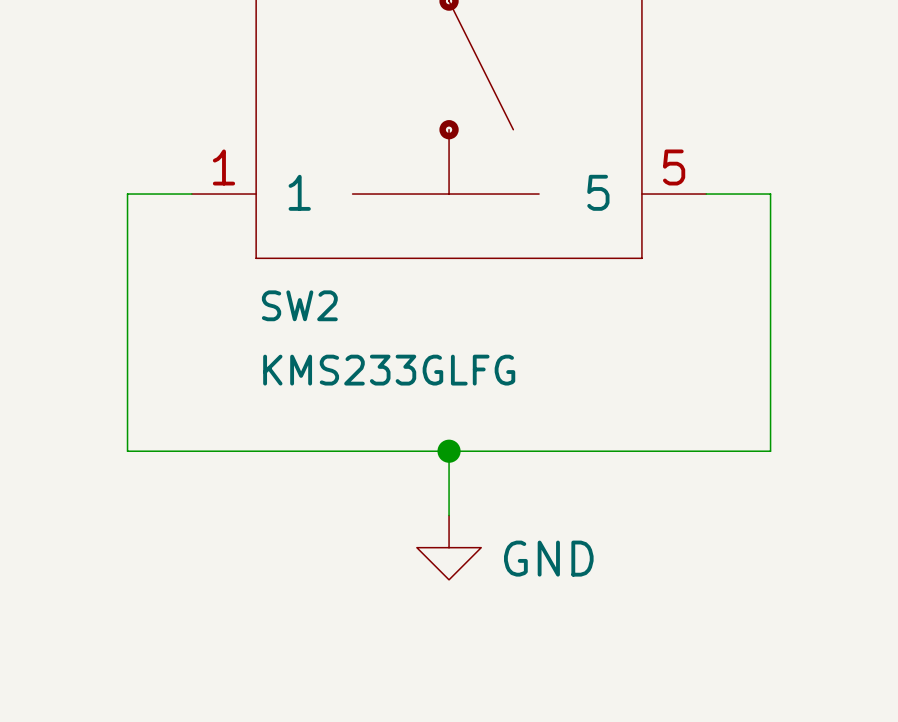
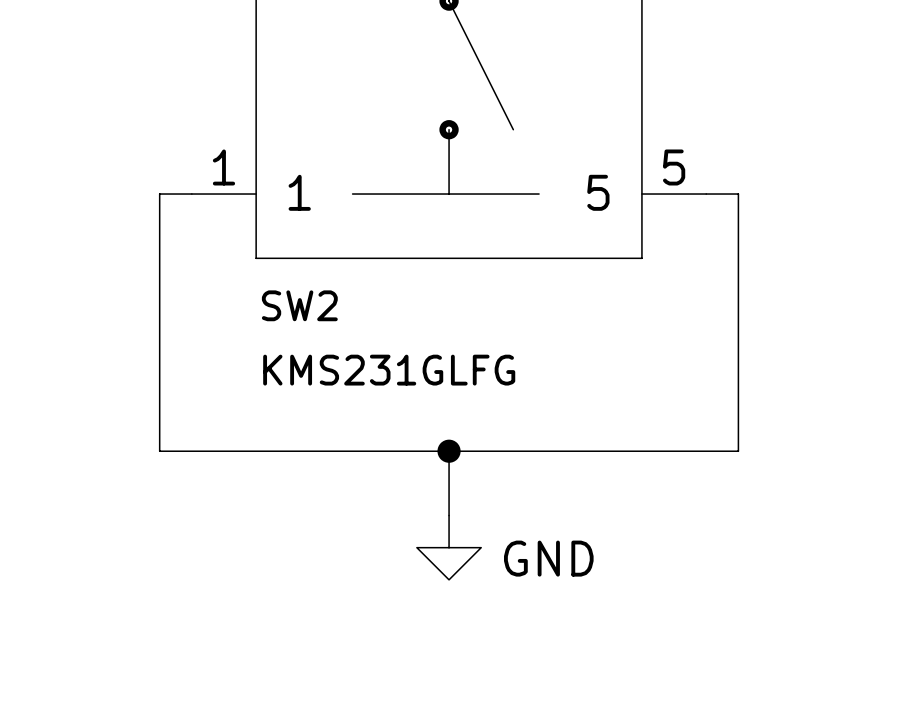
wire: (159, 194) (127, 194) (127, 451) (159, 451) -> (159, 194) (159, 451)
wire: (738, 194) (770, 194) (770, 451) (738, 451) -> (738, 194) (738, 451)
SW2 value: KMS233GLFG (389, 370) -> KMS231GLFG (389, 370)

